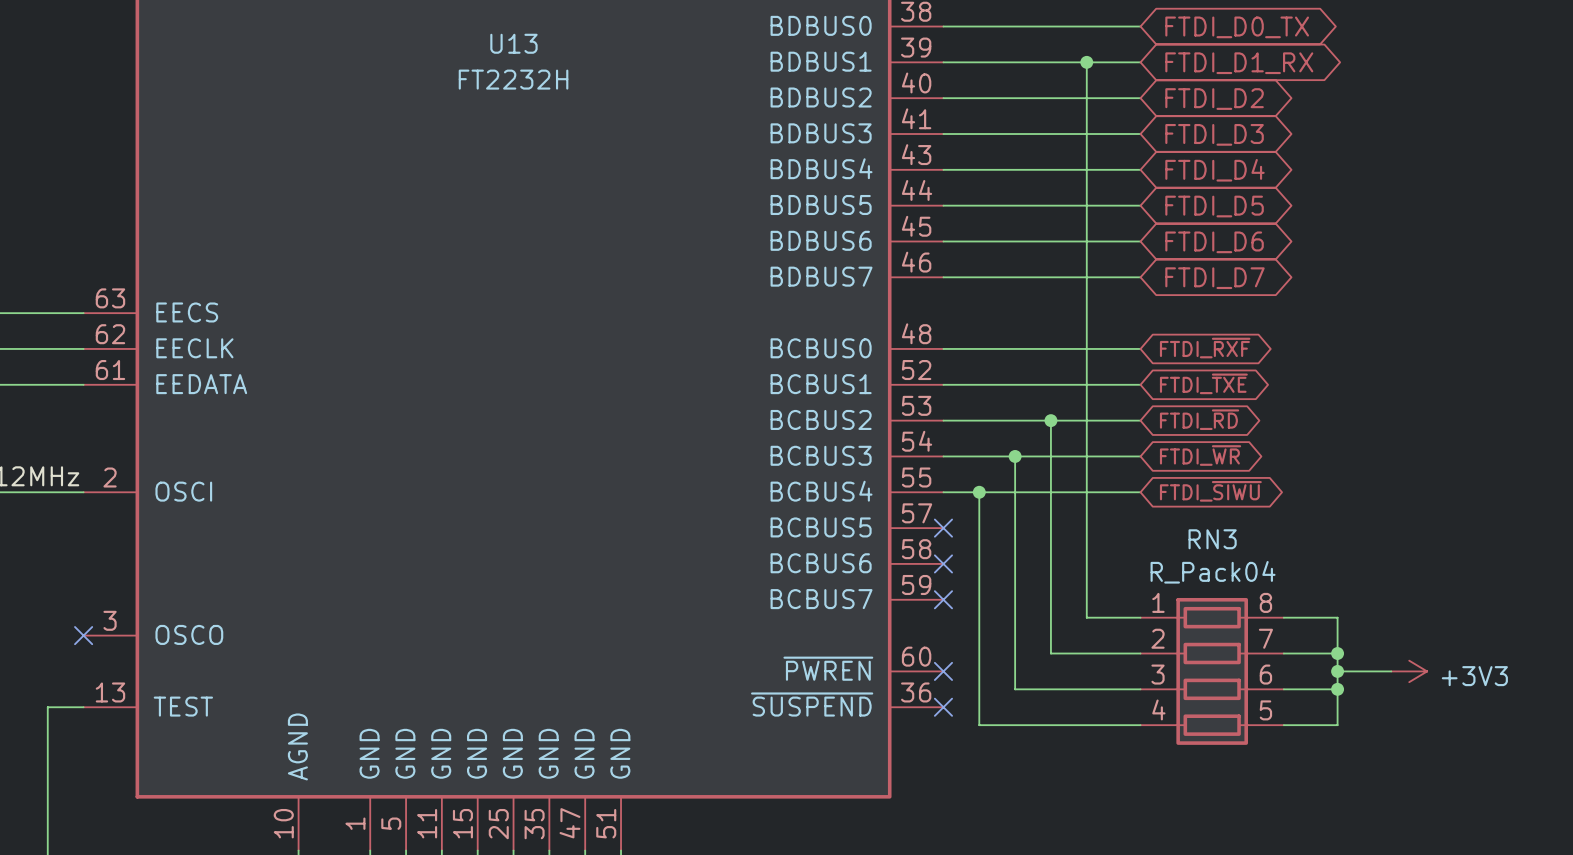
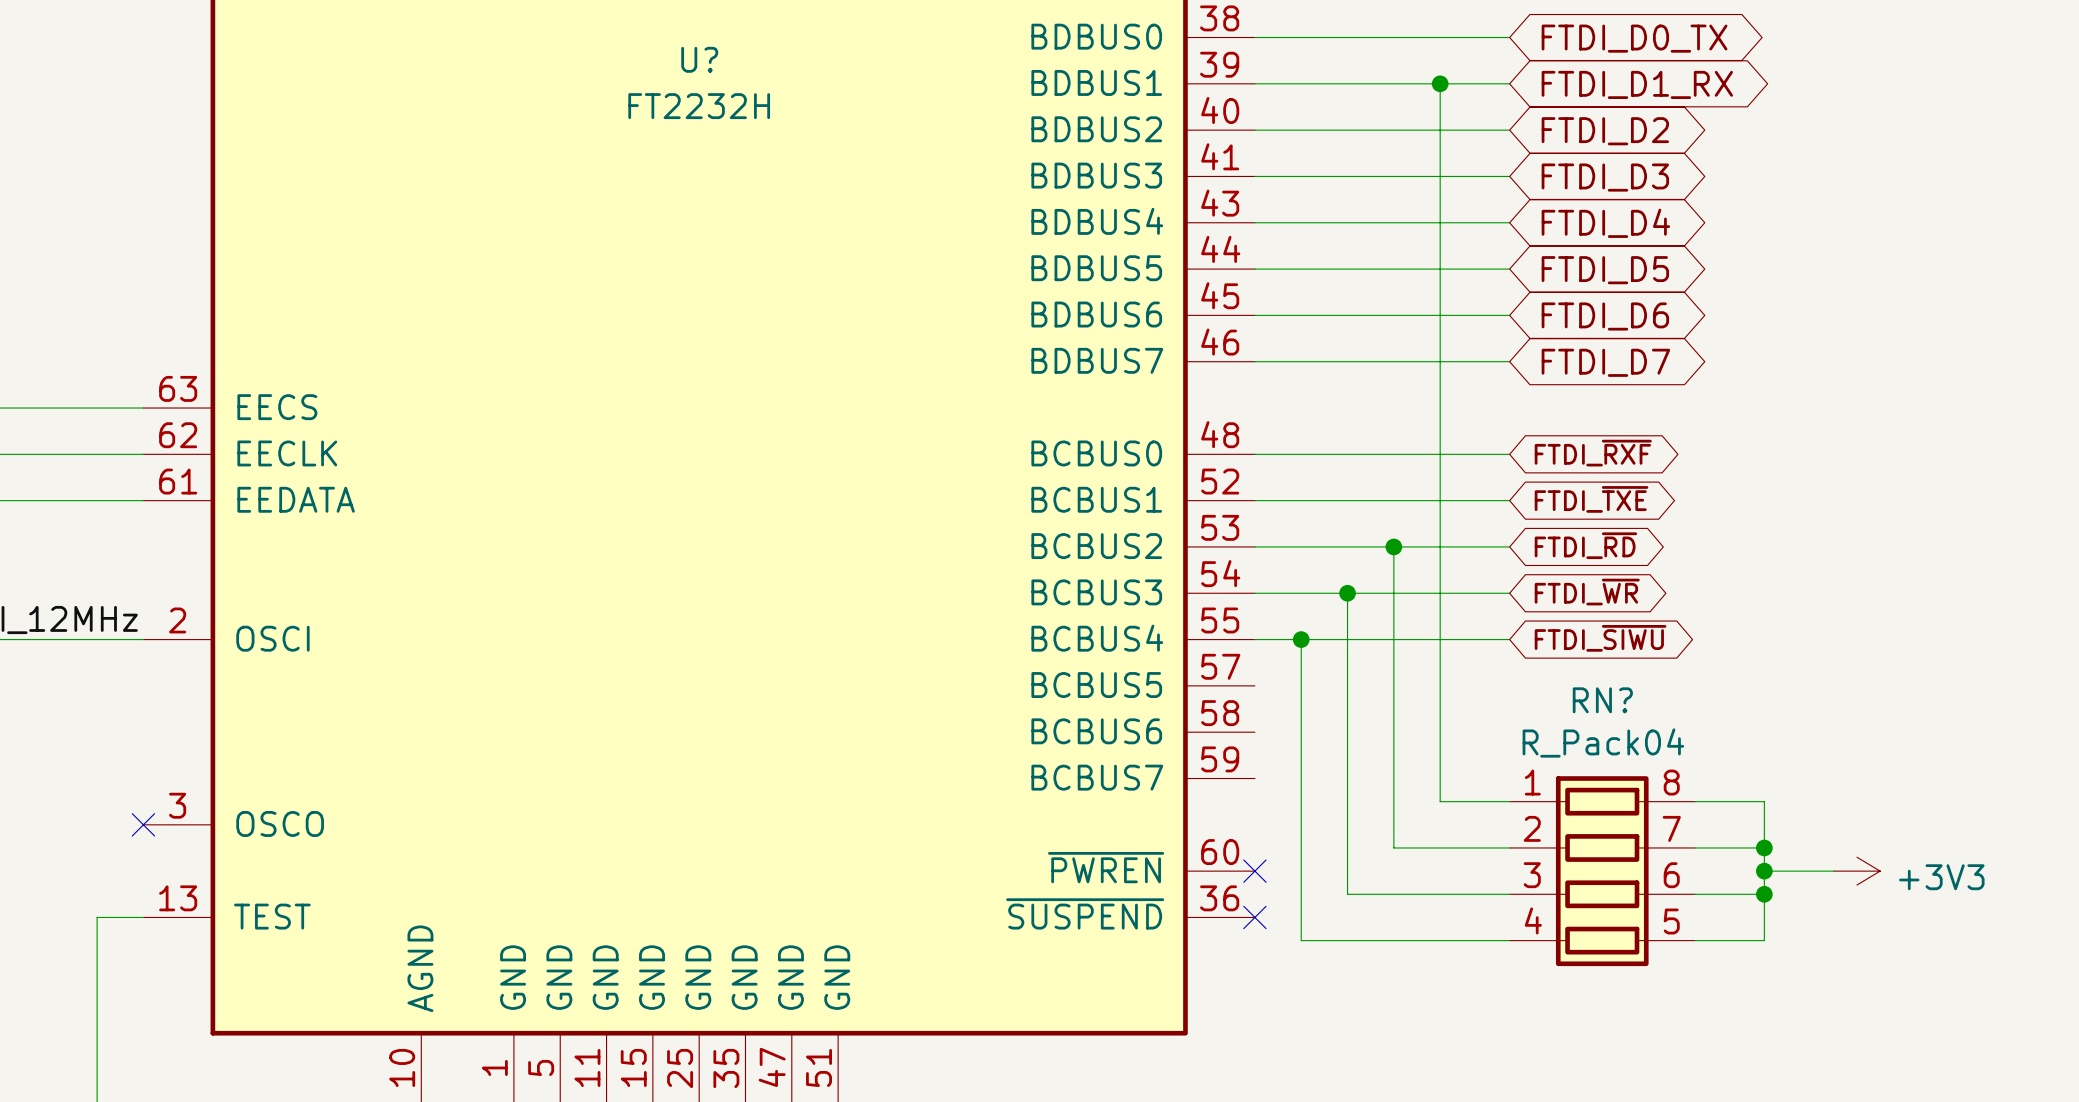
U13 name: U13 (513, 43) -> U? (699, 59)
no-connect mark: (943, 528) -> none
RN3 name: RN3 (1212, 539) -> RN? (1602, 700)
no-connect mark: (943, 563) -> none
no-connect mark: (943, 599) -> none

